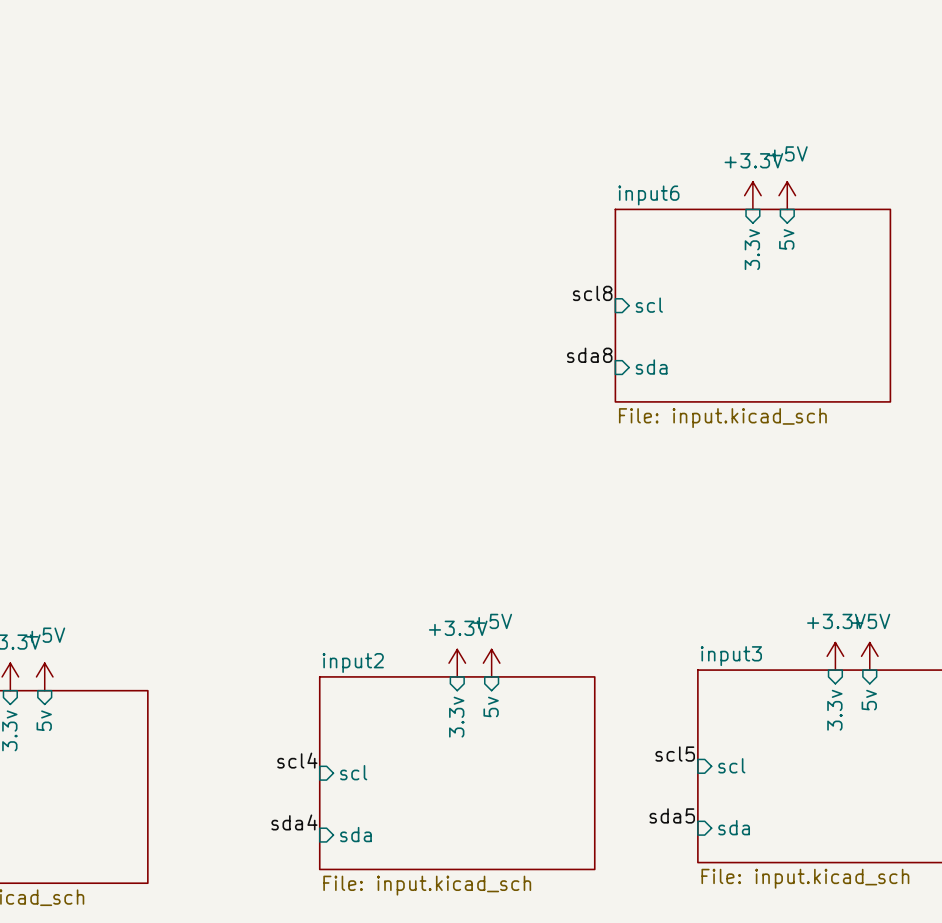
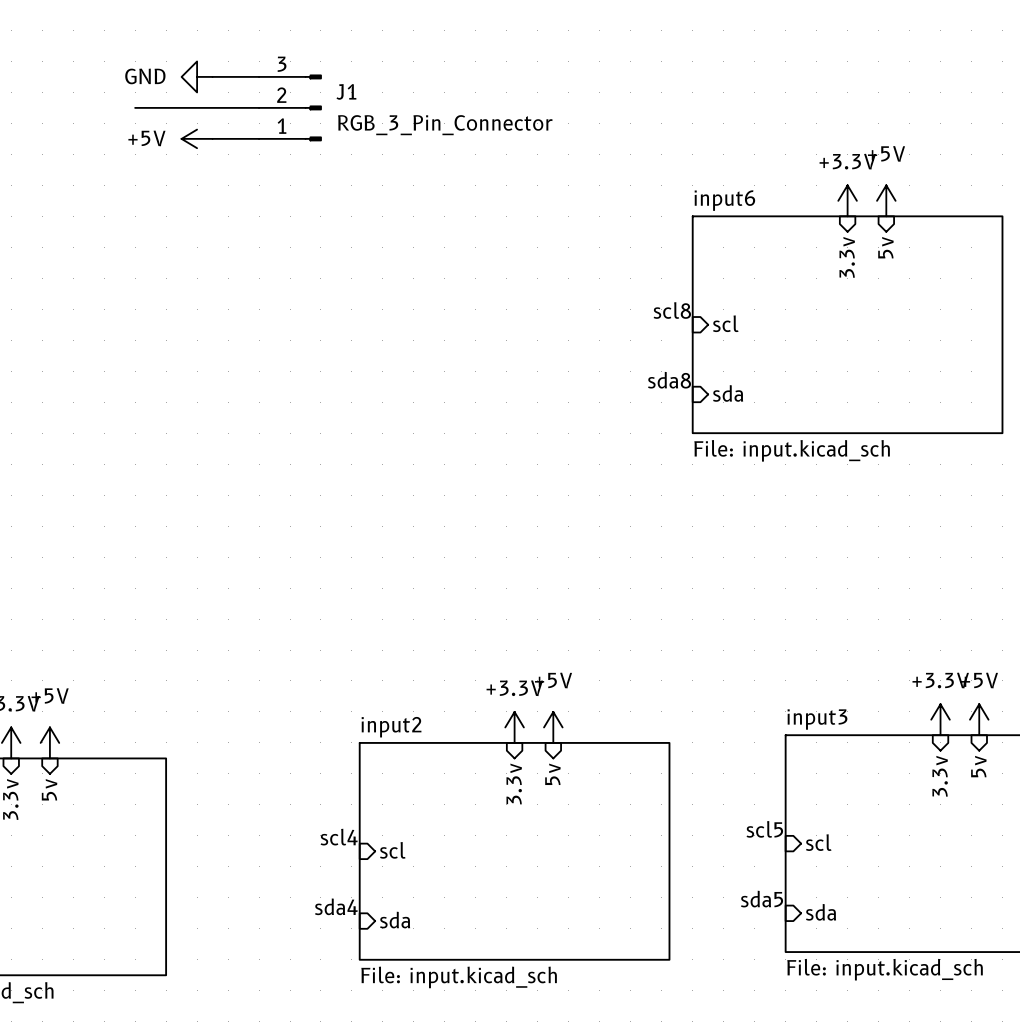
power symbol: none -> GND (197, 76)
wire: none -> (212, 76) (259, 76)
wire: none -> (135, 107) (259, 107)
J1: none -> RGB_3_Pin_Connector (290, 107)
power symbol: none -> +5V (197, 138)
wire: none -> (212, 138) (259, 138)

